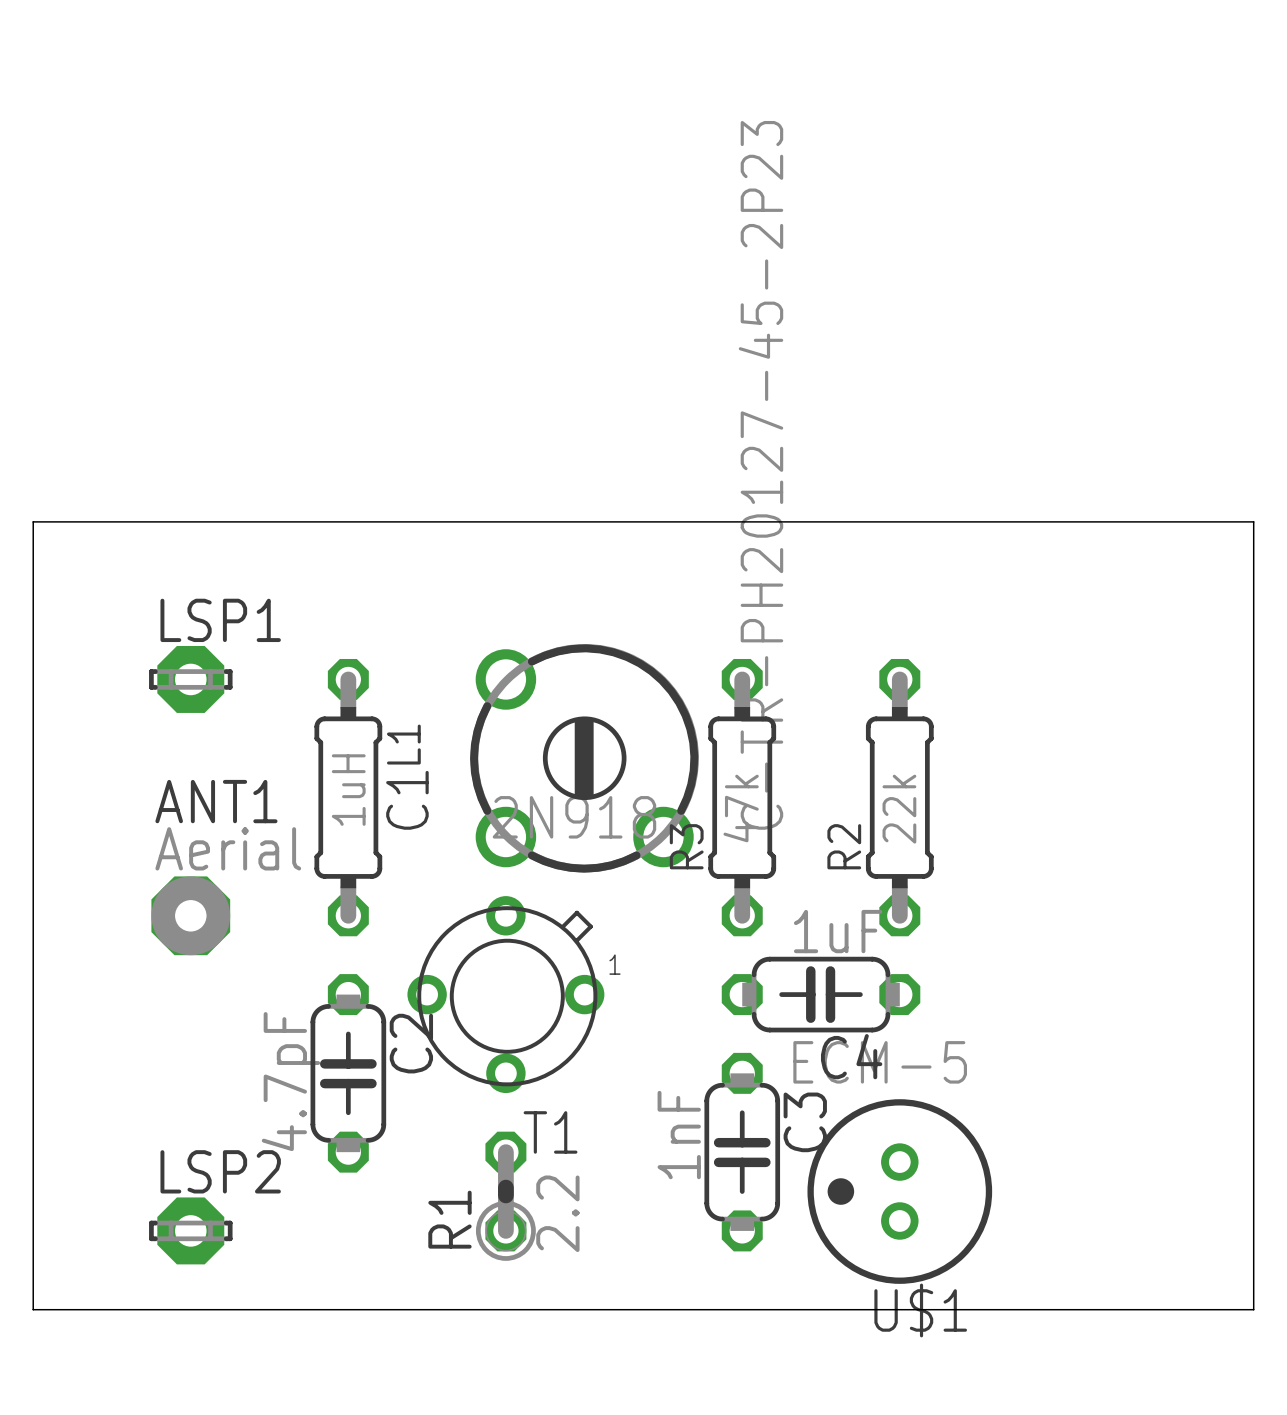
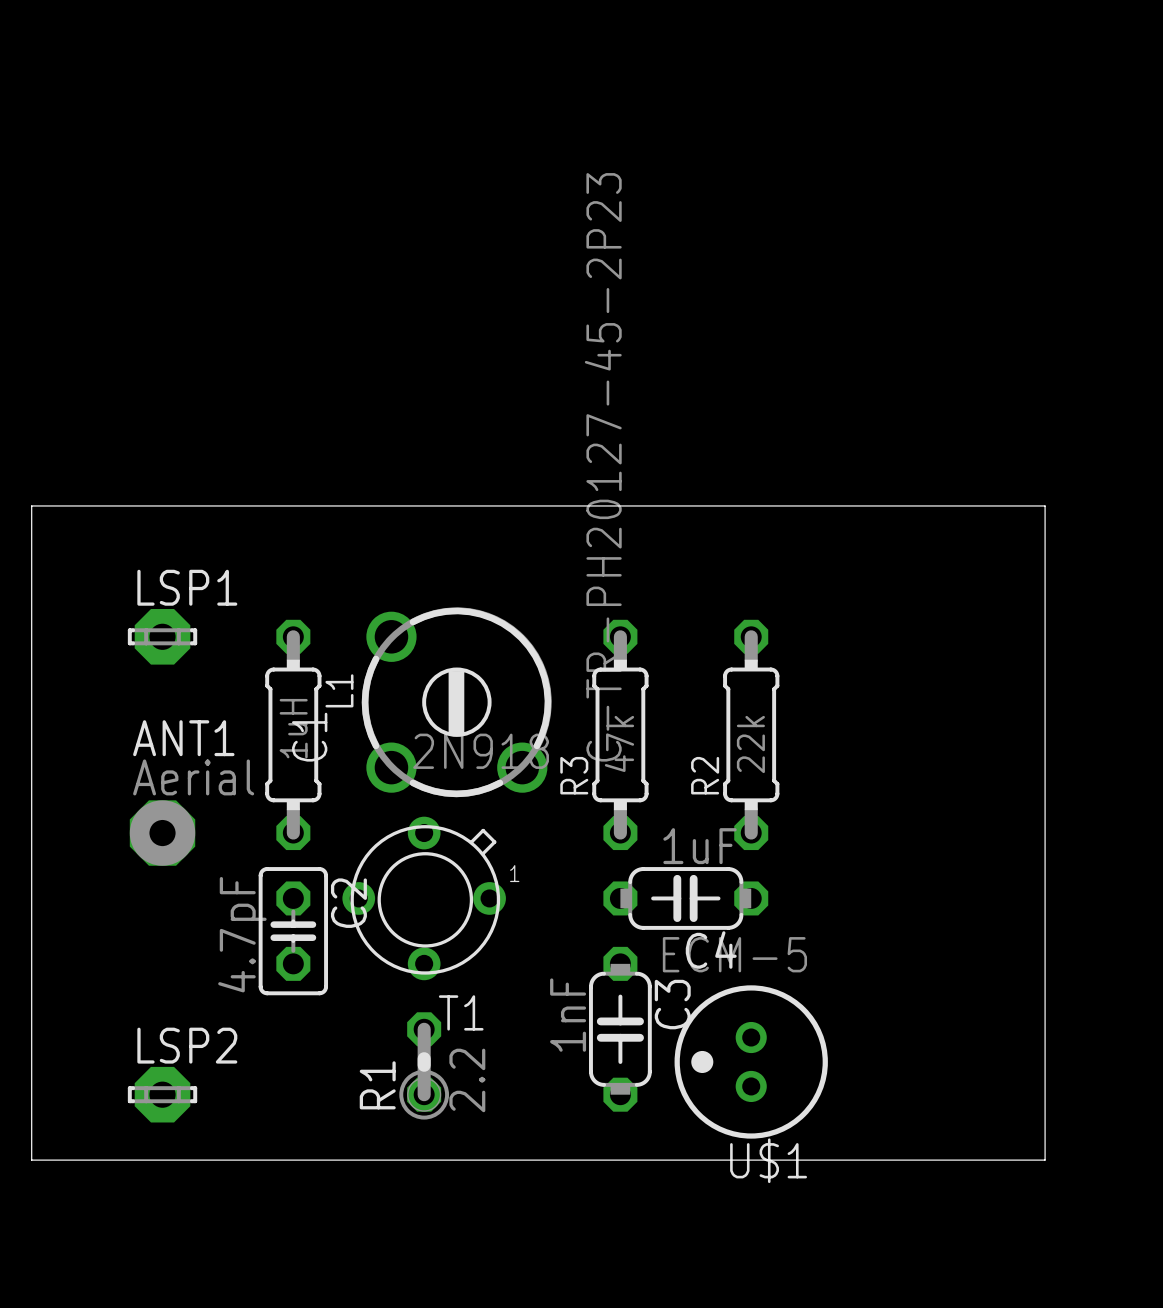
C1 position: (584, 758) -> (456, 702)
C2 footprint: [310, 974, 387, 1173] -> [258, 867, 329, 996]

